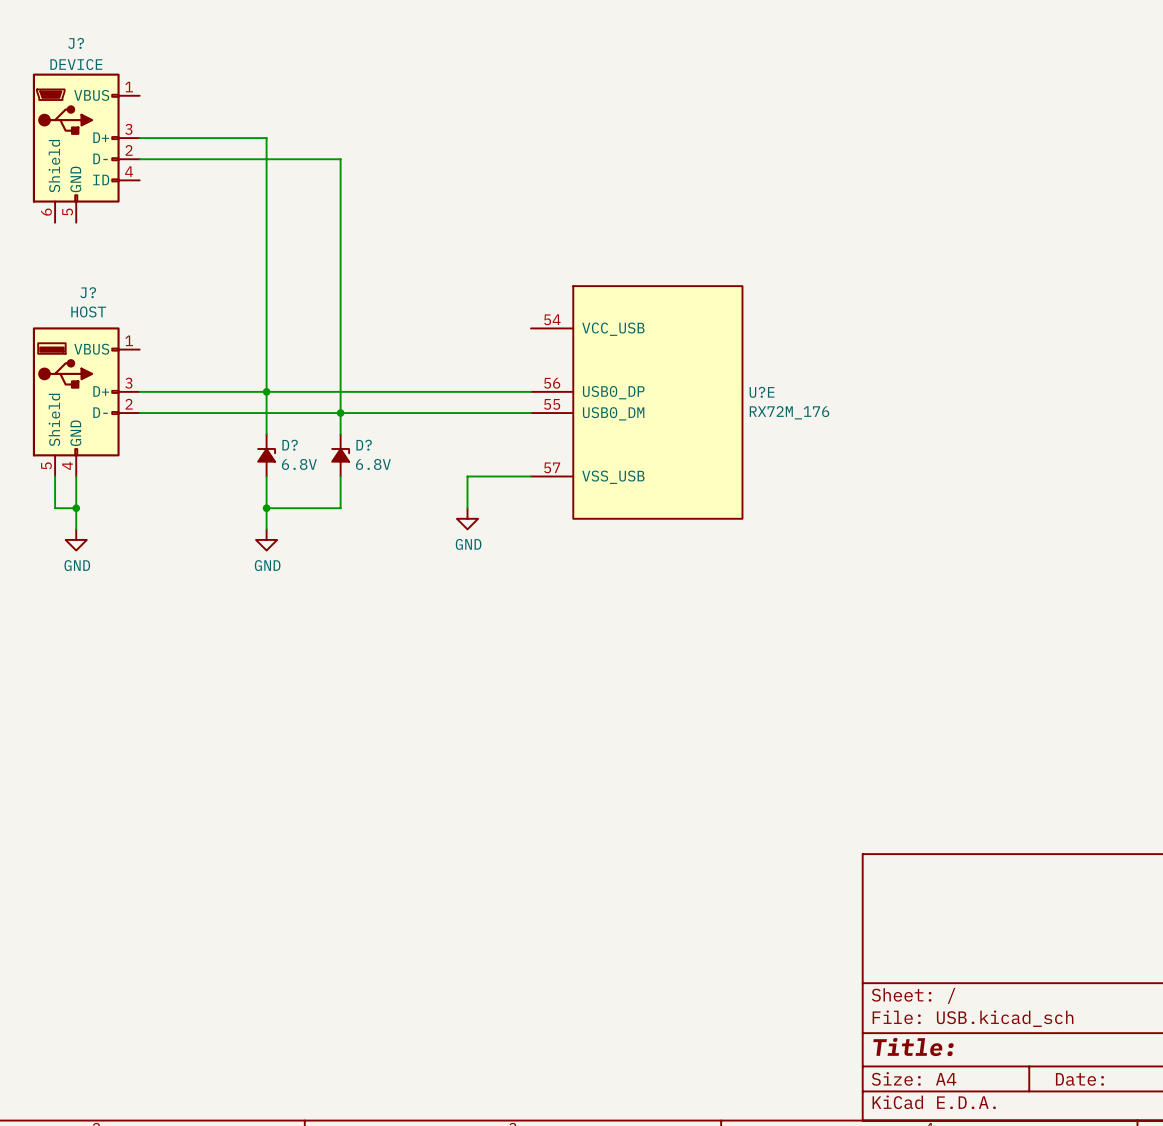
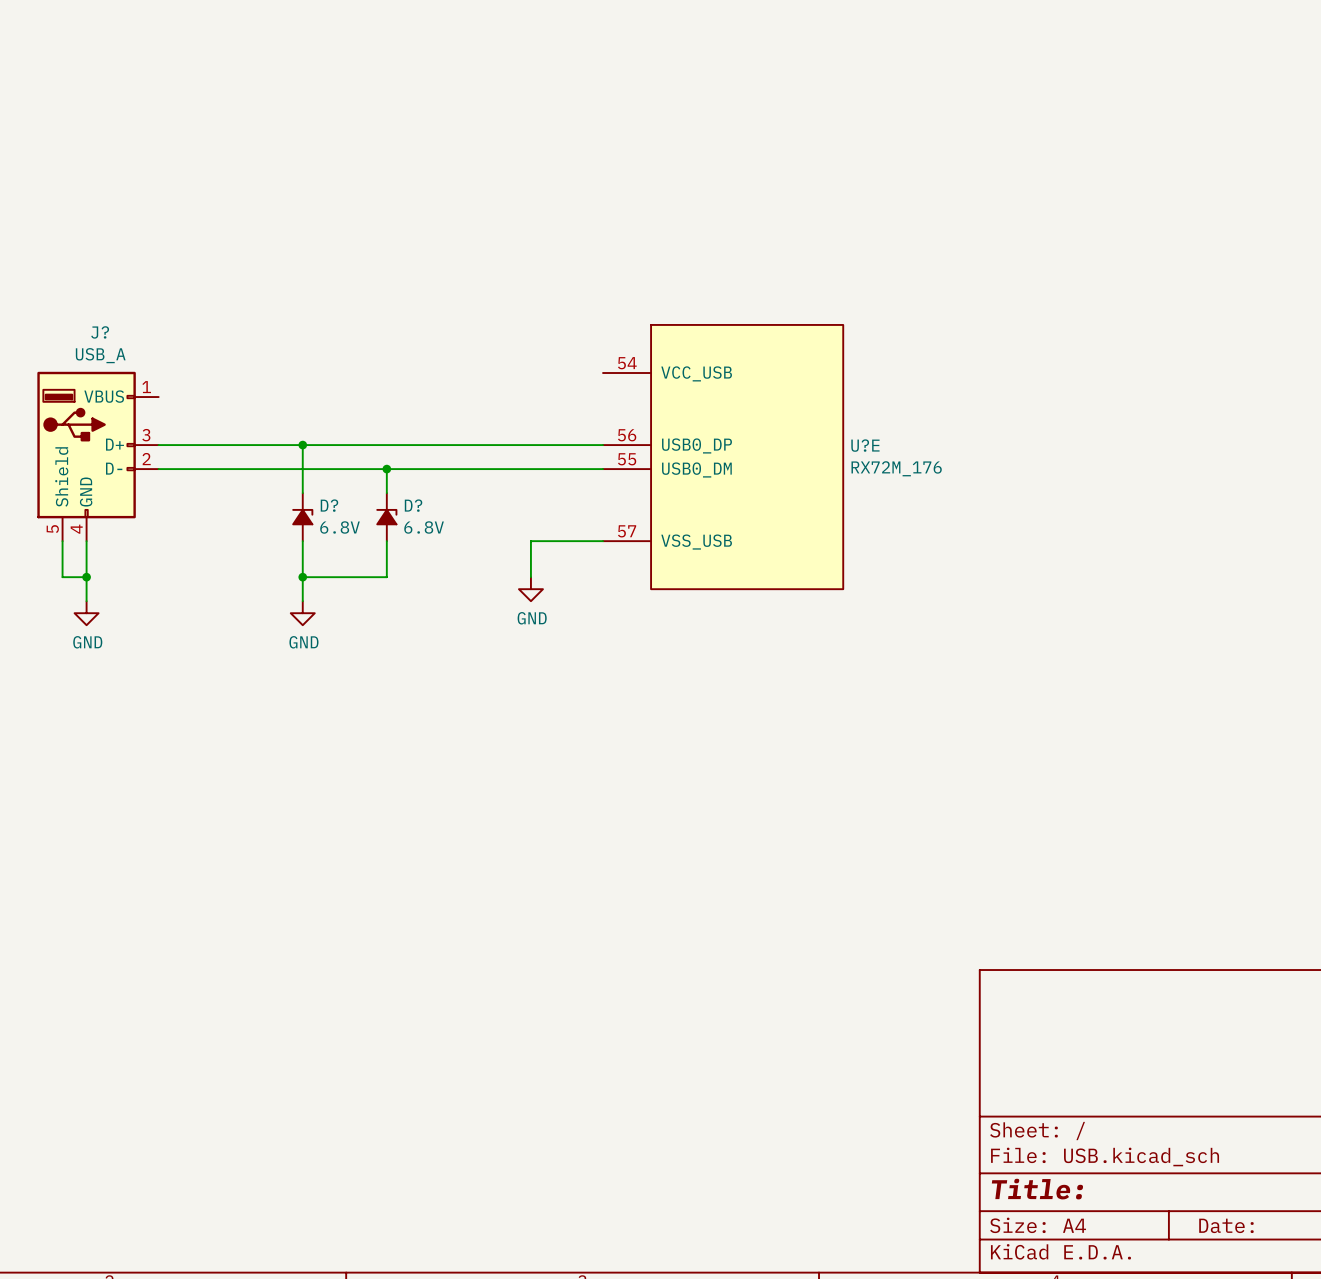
wire: (139, 138) (266, 138) (266, 391) -> none
J?: DEVICE (86, 148) -> none
wire: (139, 159) (340, 159) (340, 413) -> none
J? value: HOST (88, 311) -> USB_A (100, 355)

